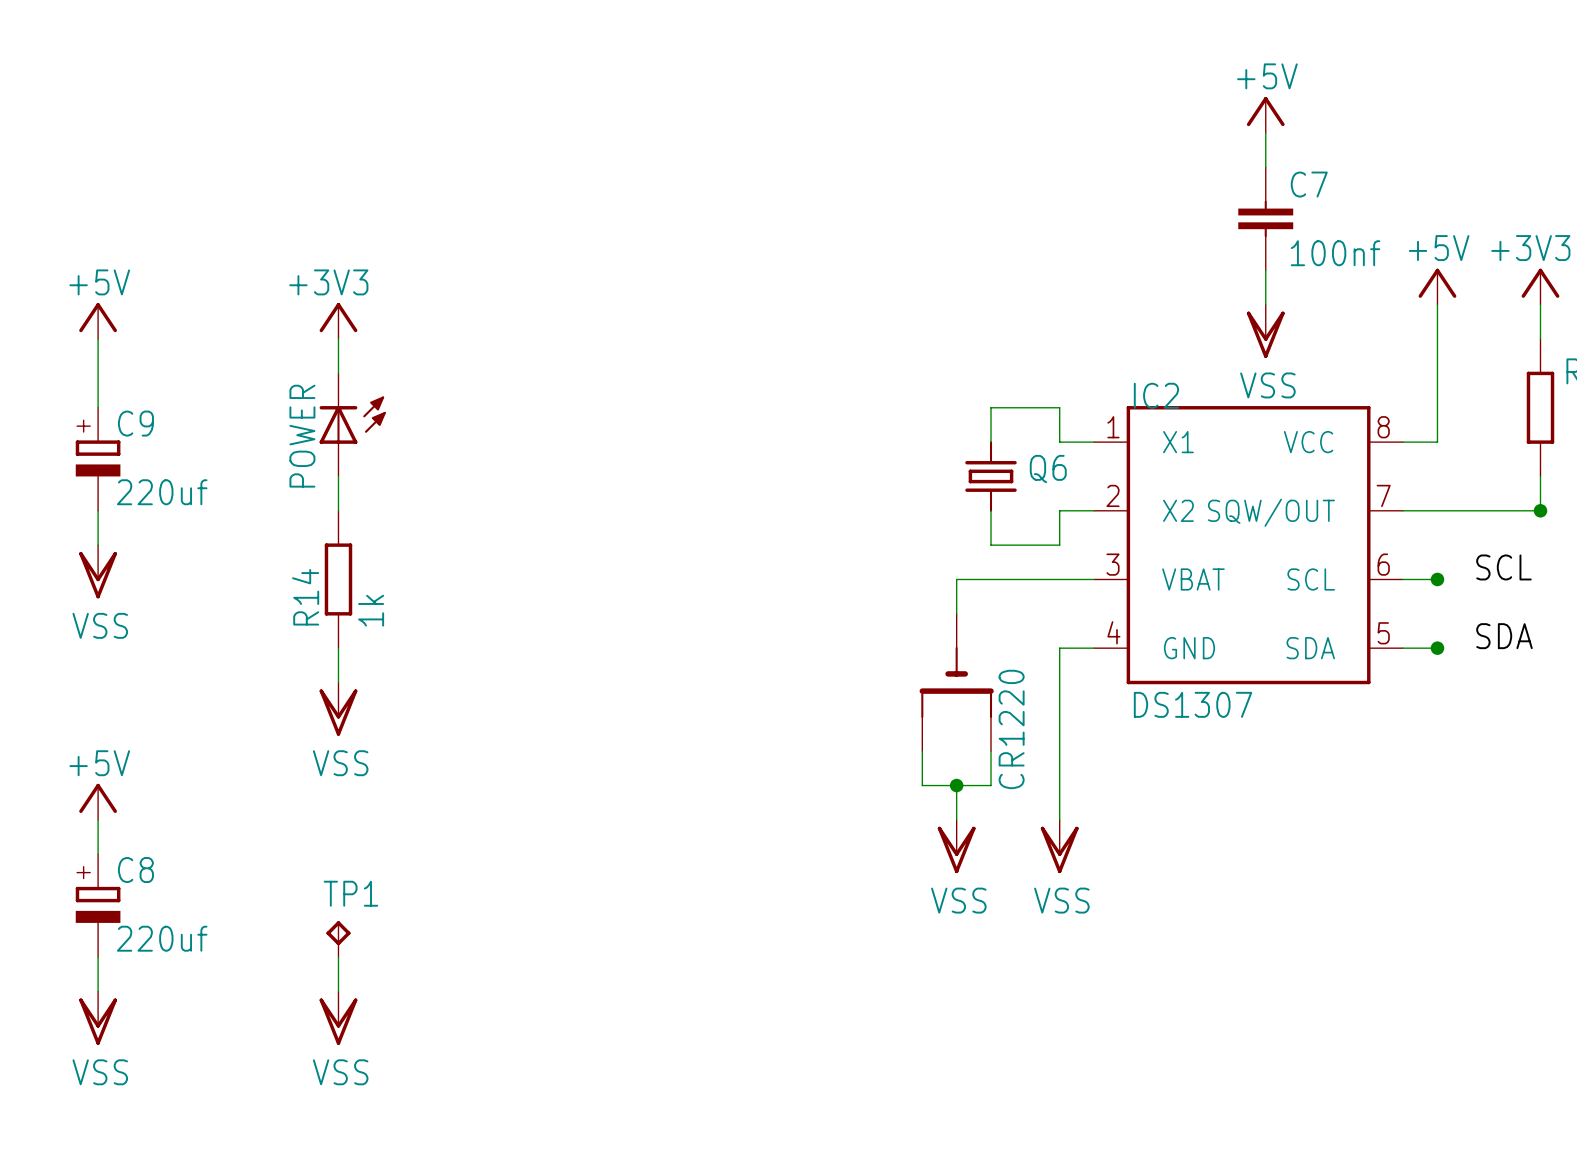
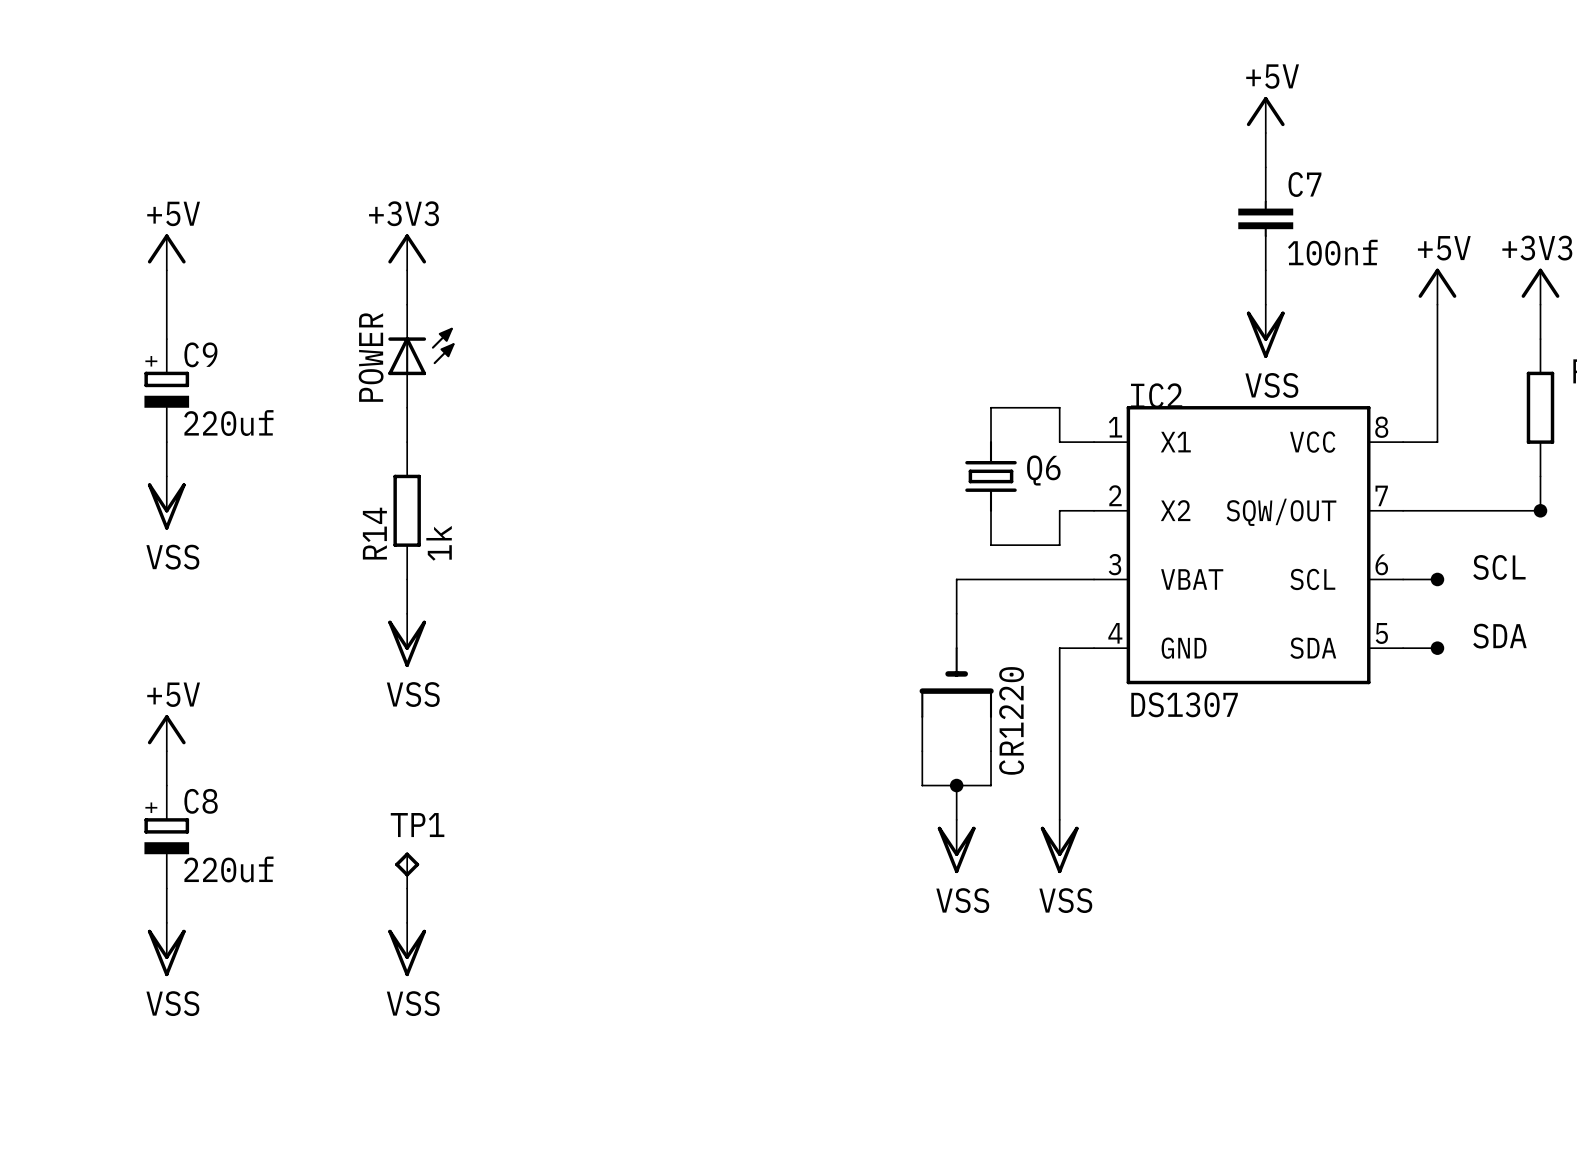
power symbol position: +5V (98, 321) -> +5V (166, 252)
power symbol position: +3V3 (338, 321) -> +3V3 (407, 252)
wire: (98, 339) (98, 407) -> (166, 270) (166, 339)
wire: (338, 339) (338, 373) -> (407, 270) (407, 304)
POWER position: (352, 424) -> (421, 356)
C9 position: (98, 459) -> (166, 390)
wire: (338, 476) (338, 510) -> (407, 407) (407, 442)
wire: (98, 510) (98, 545) -> (166, 442) (166, 476)
power symbol position: VSS (98, 571) -> VSS (166, 503)
R14 position: (338, 579) -> (407, 510)
wire: (338, 648) (338, 682) -> (407, 579) (407, 613)
power symbol position: VSS (338, 709) -> VSS (407, 640)
power symbol position: +5V (98, 801) -> +5V (166, 733)
wire: (98, 819) (98, 854) -> (166, 751) (166, 785)
C8 position: (98, 905) -> (166, 837)
TP1 position: (338, 939) -> (407, 870)
power symbol: none -> VSS (166, 949)
power symbol: none -> VSS (407, 949)
wire: (98, 957) (98, 991) -> (166, 888) (166, 922)
wire: (338, 957) (338, 991) -> (407, 888) (407, 922)
power symbol: VSS (98, 1018) -> none
power symbol: VSS (338, 1018) -> none

